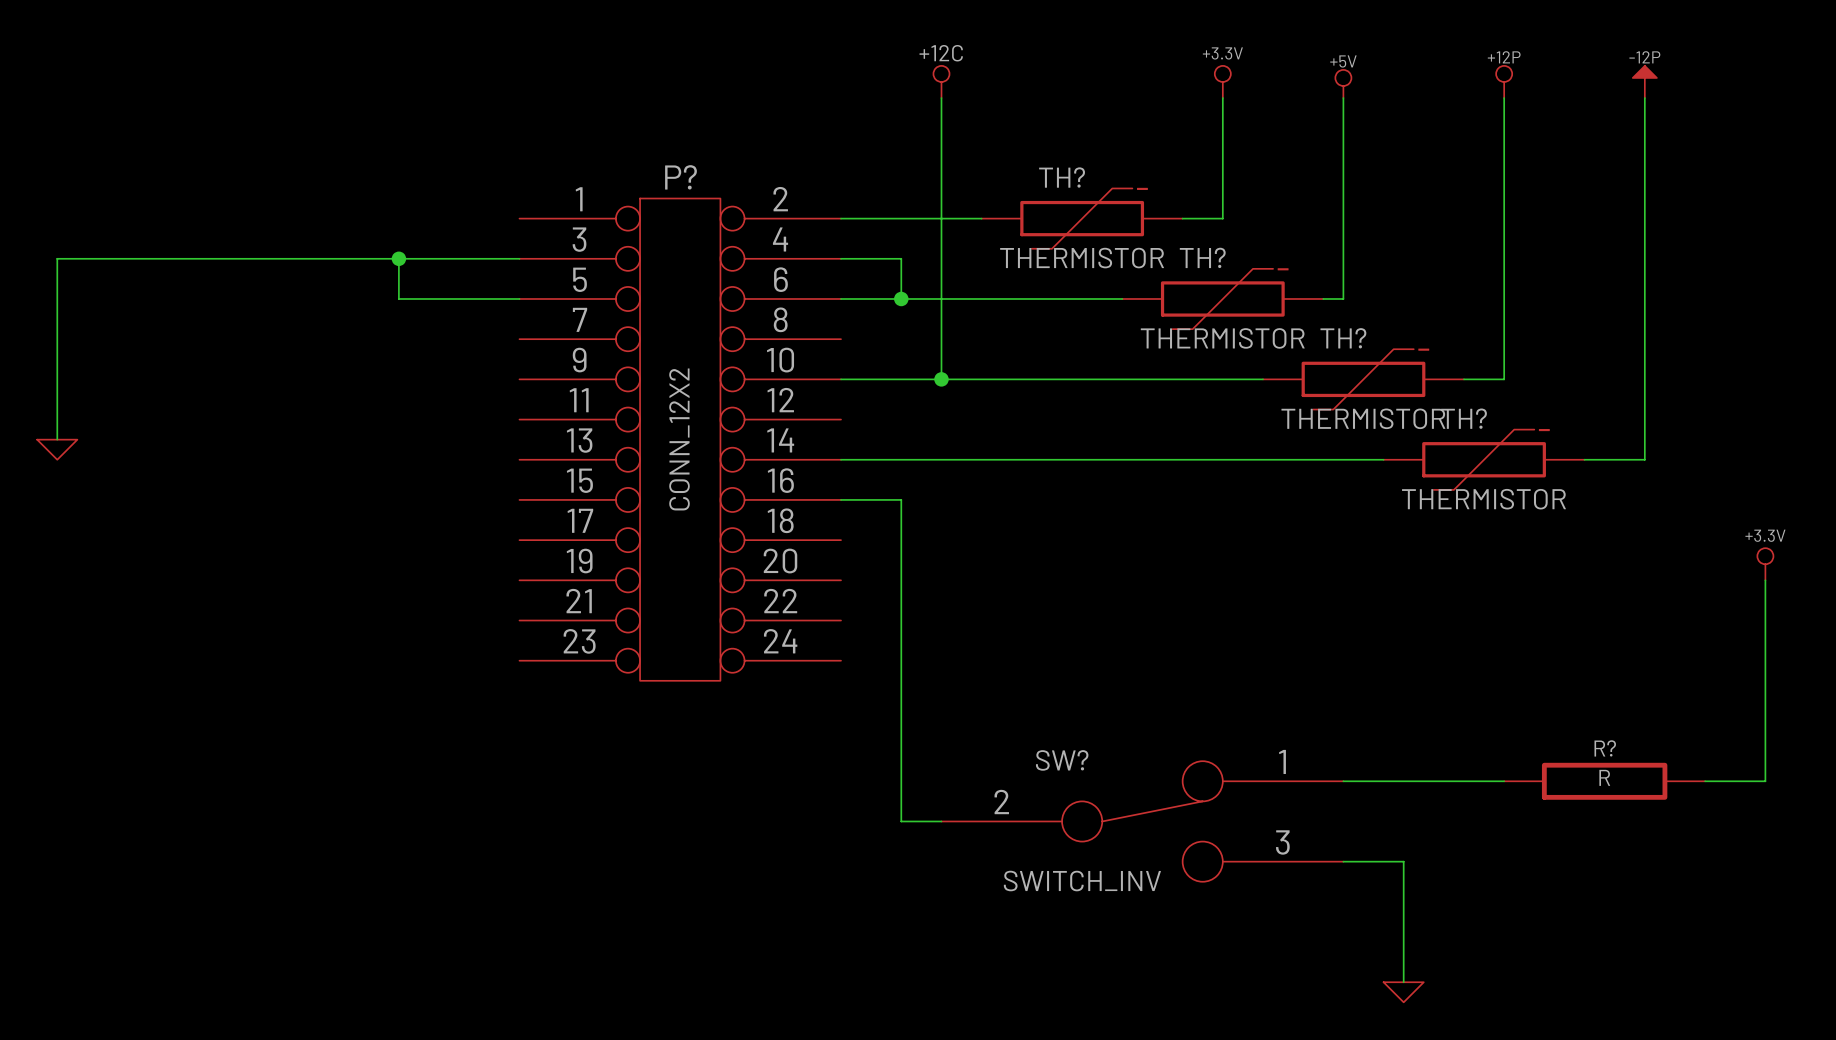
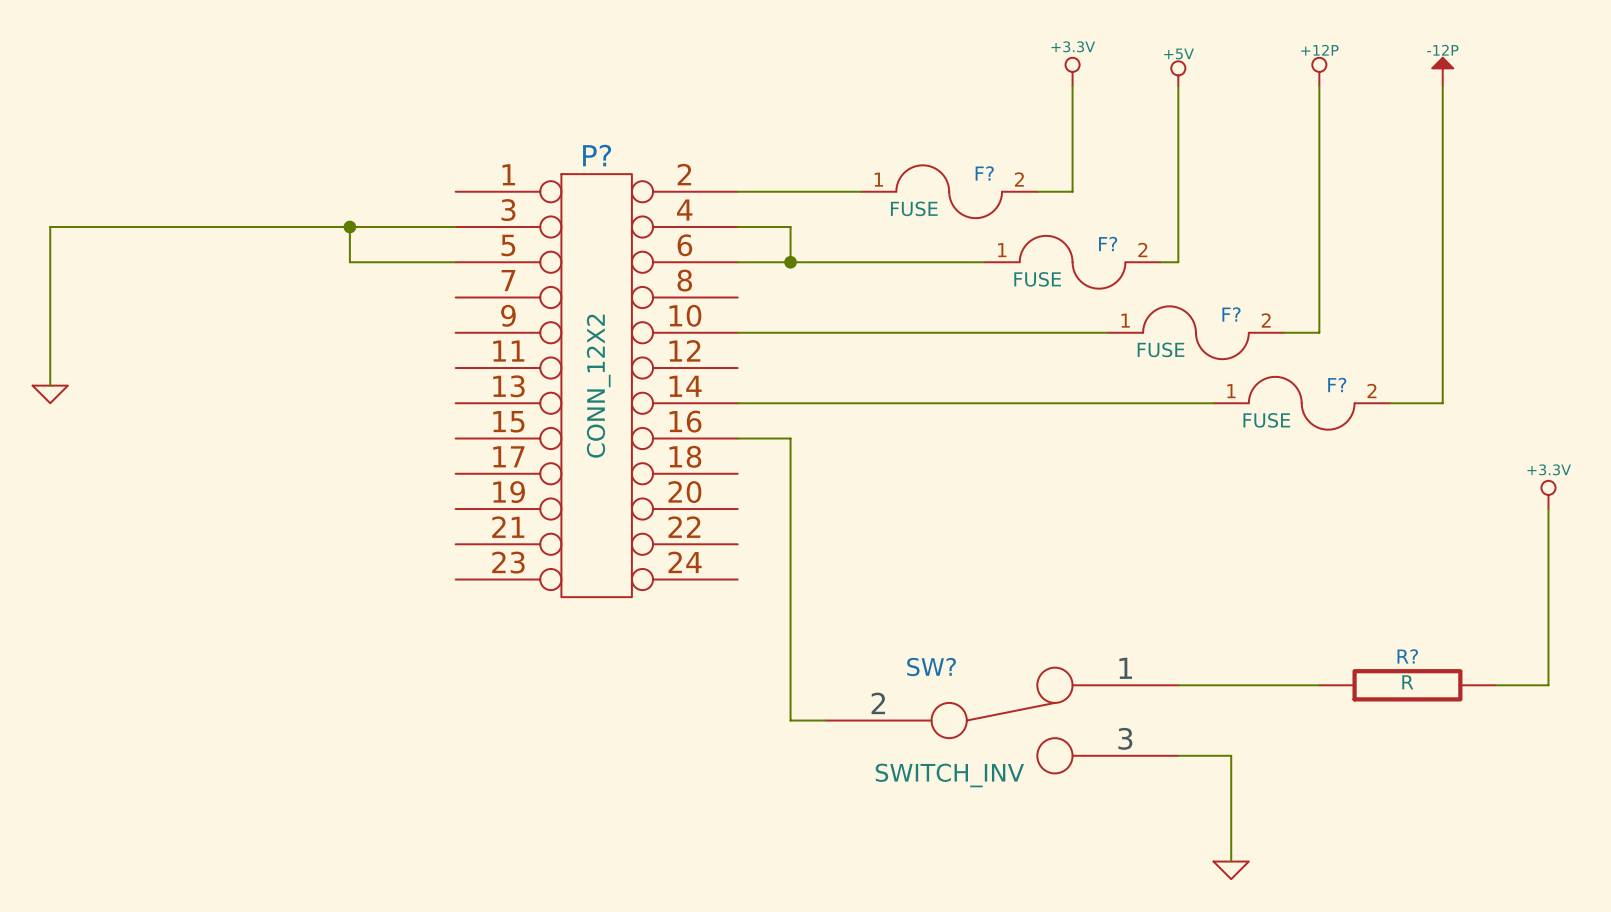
power symbol: +12C (941, 81) -> none
wire: (941, 98) (941, 379) -> none
TH?: THERMISTOR (1082, 218) -> none
F?: none -> FUSE (949, 191)
TH?: THERMISTOR (1222, 298) -> none
F?: none -> FUSE (1072, 262)
junction: (941, 379) -> none
TH?: THERMISTOR (1363, 379) -> none
F?: none -> FUSE (1195, 332)
TH?: THERMISTOR (1484, 459) -> none
F?: none -> FUSE (1301, 403)

